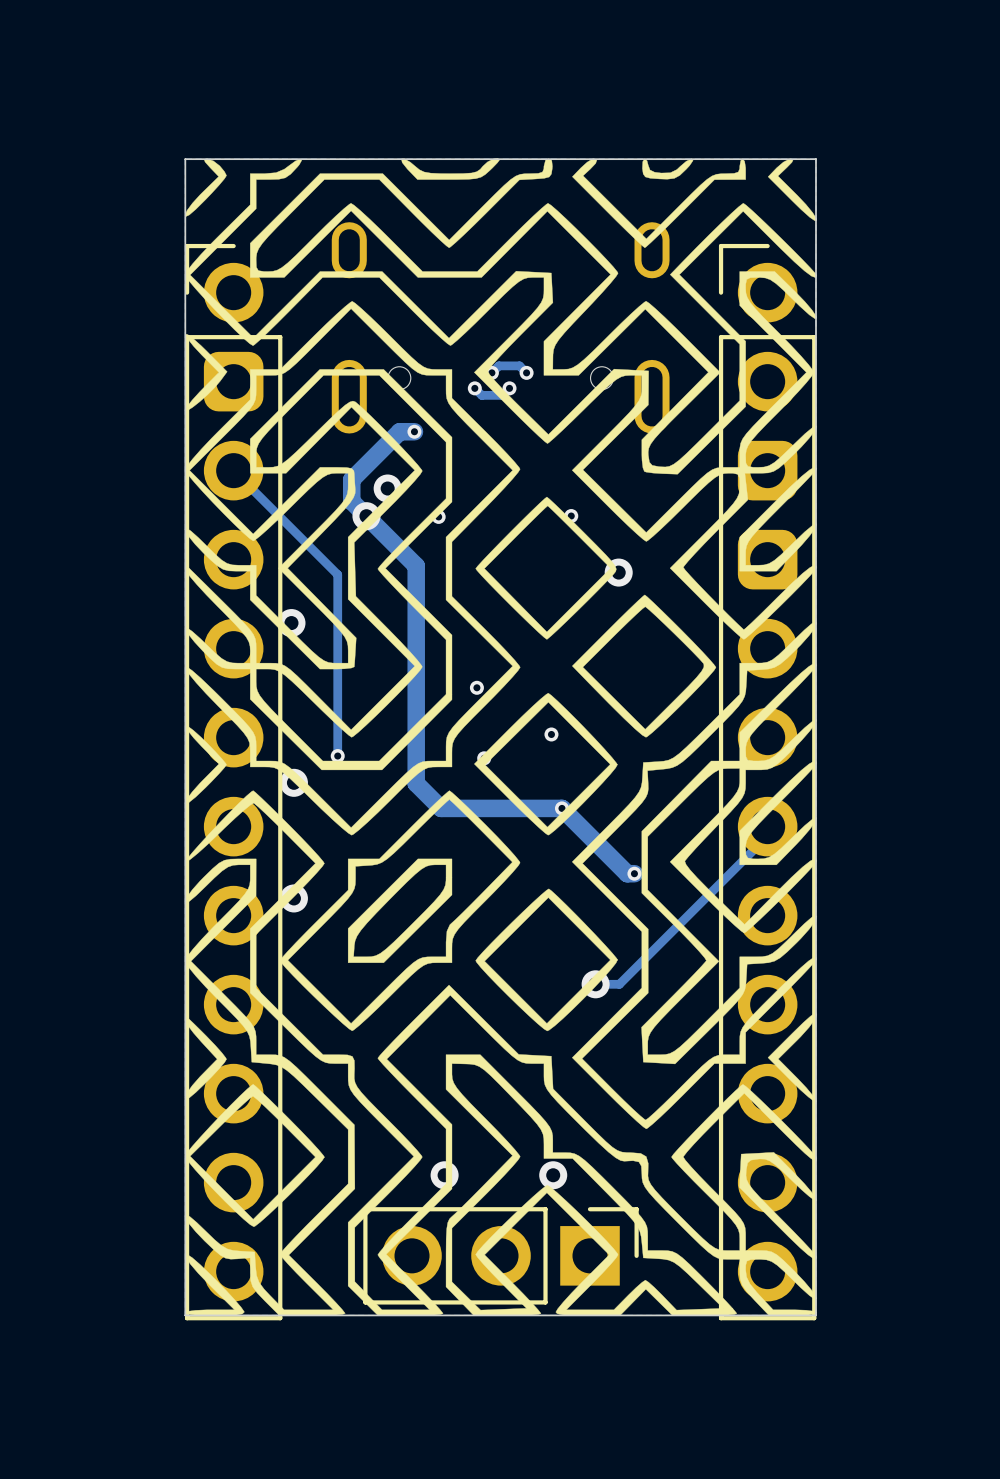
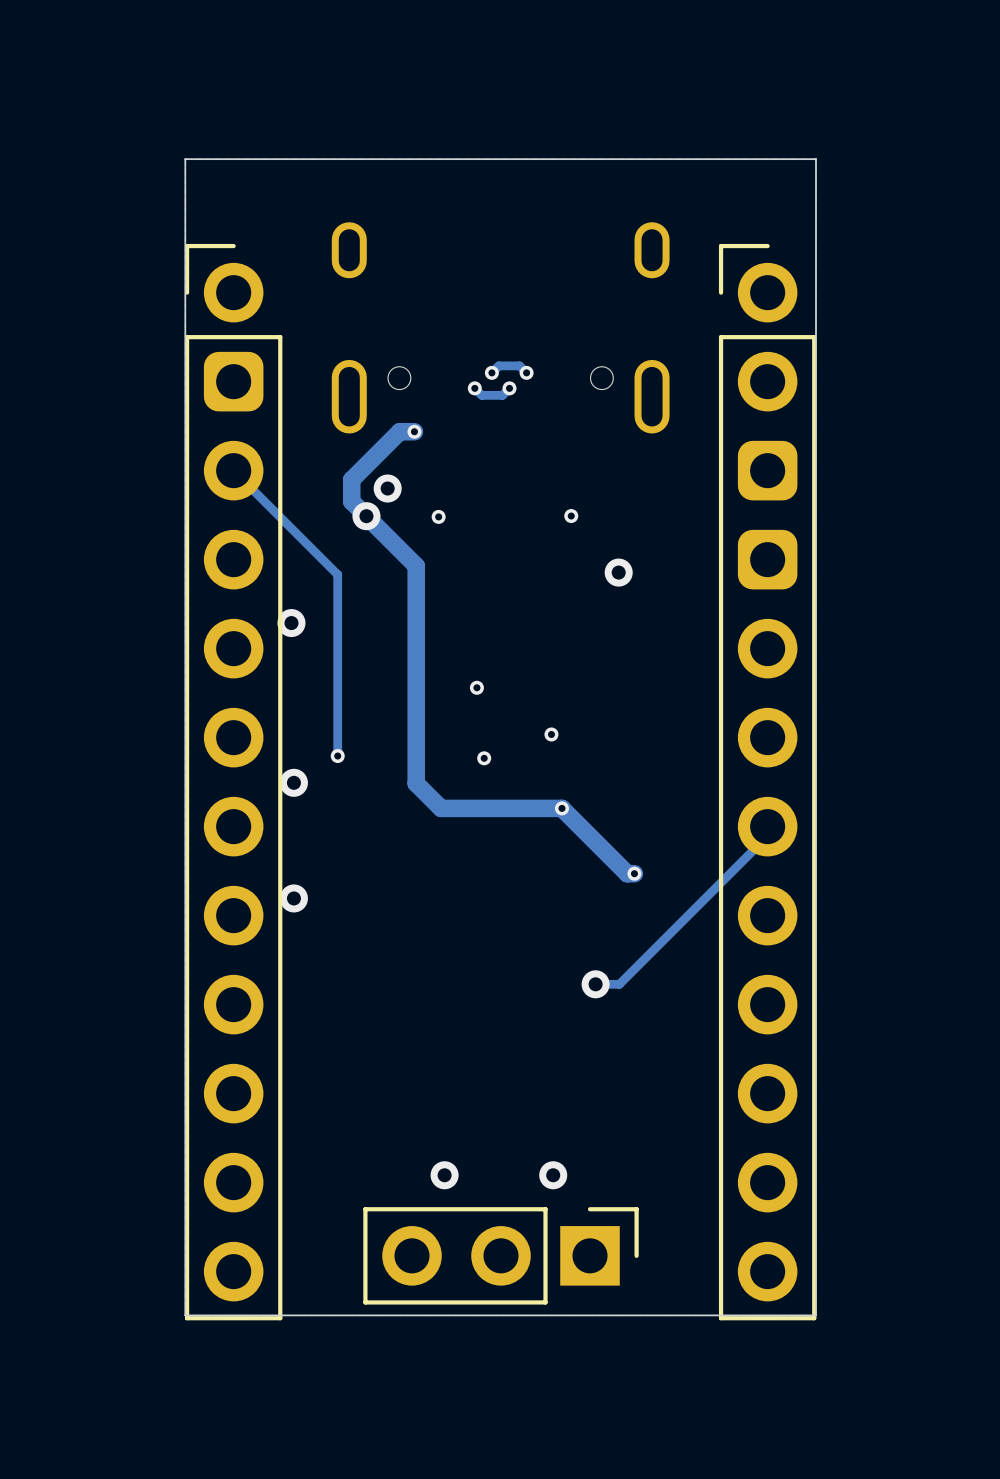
drawing: [184, 158, 818, 1316] -> none

